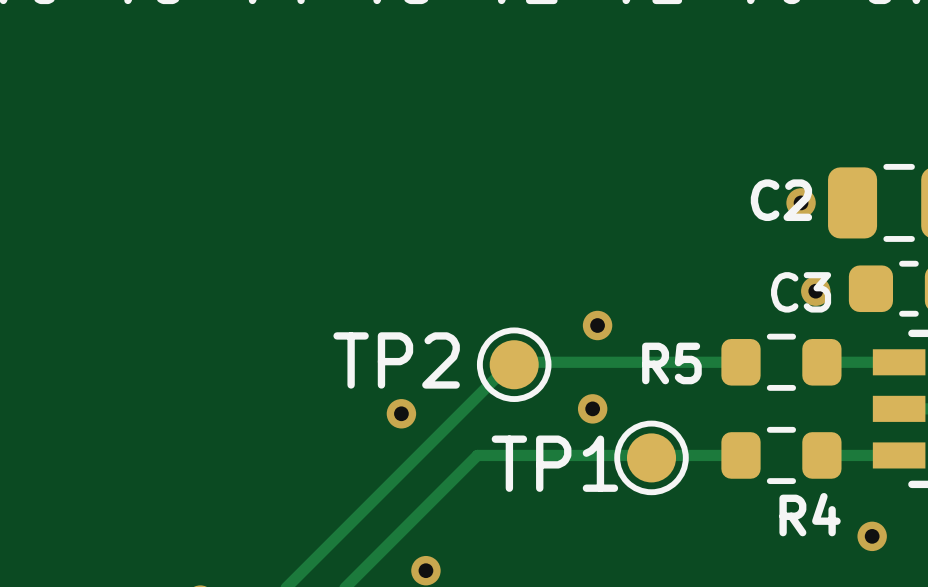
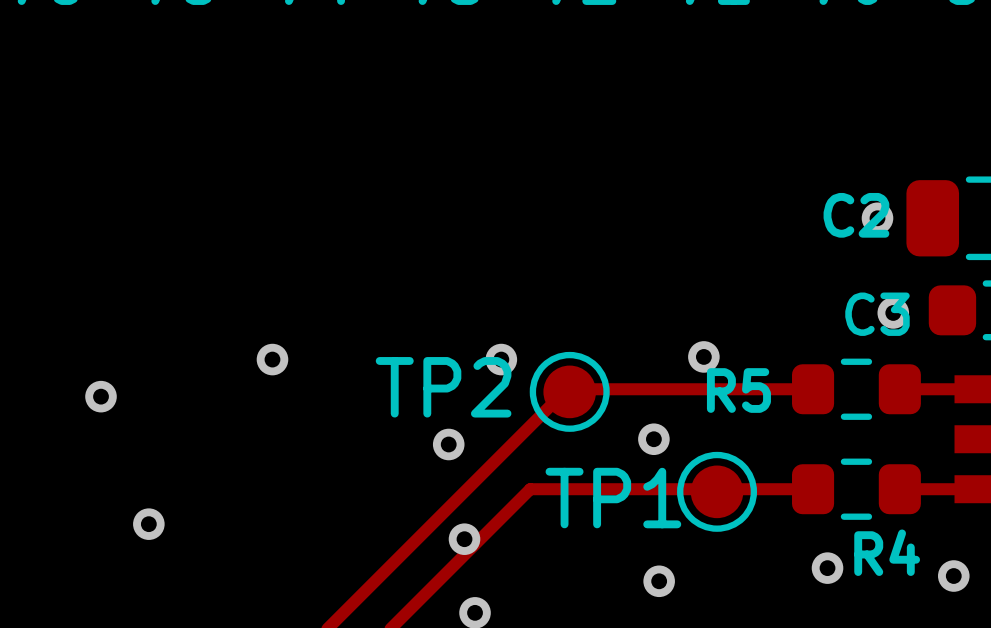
via position: (597, 325) -> (703, 356)
via: none -> (272, 359)
via: none -> (501, 359)
via: none -> (101, 396)
via: none -> (148, 524)
via: none -> (464, 539)
via: none -> (827, 568)
via: none -> (659, 581)

